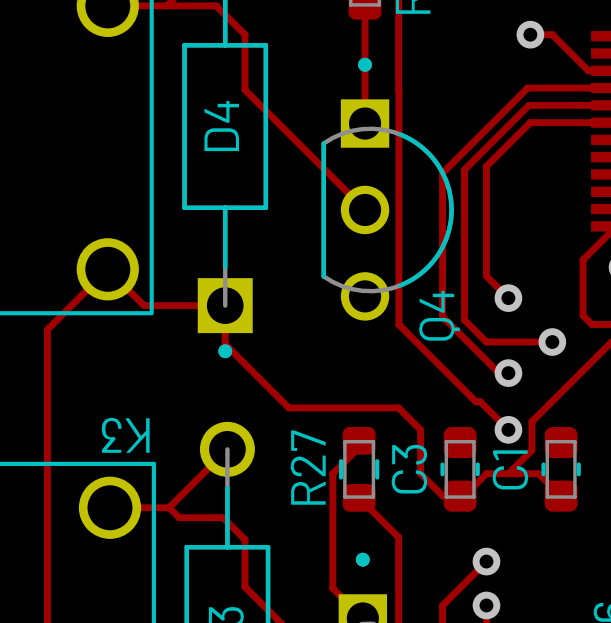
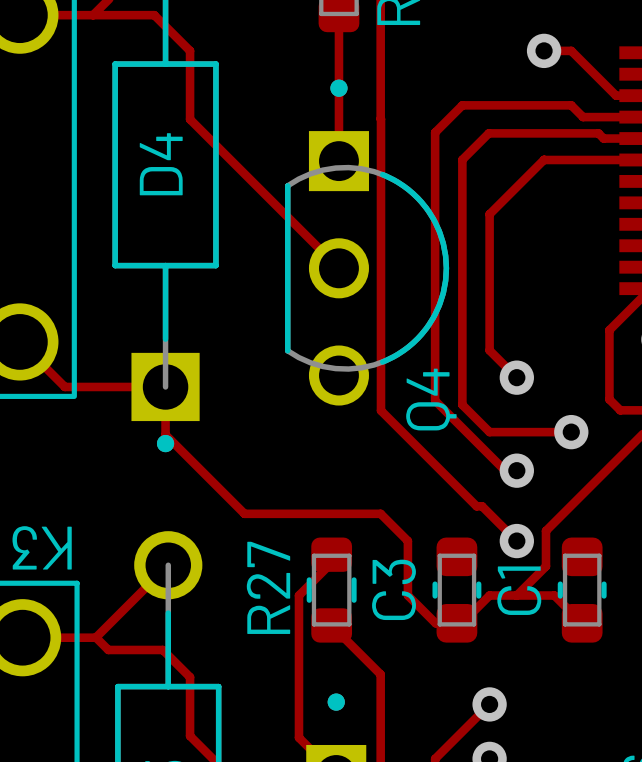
track: (561, 88) (527, 88) (442, 173) -> (583, 117) (571, 105) (462, 105) (435, 132) (435, 222)
track: (578, 105) (528, 105) (464, 169) -> (603, 138) (598, 133) (488, 133) (462, 159) (462, 218)

